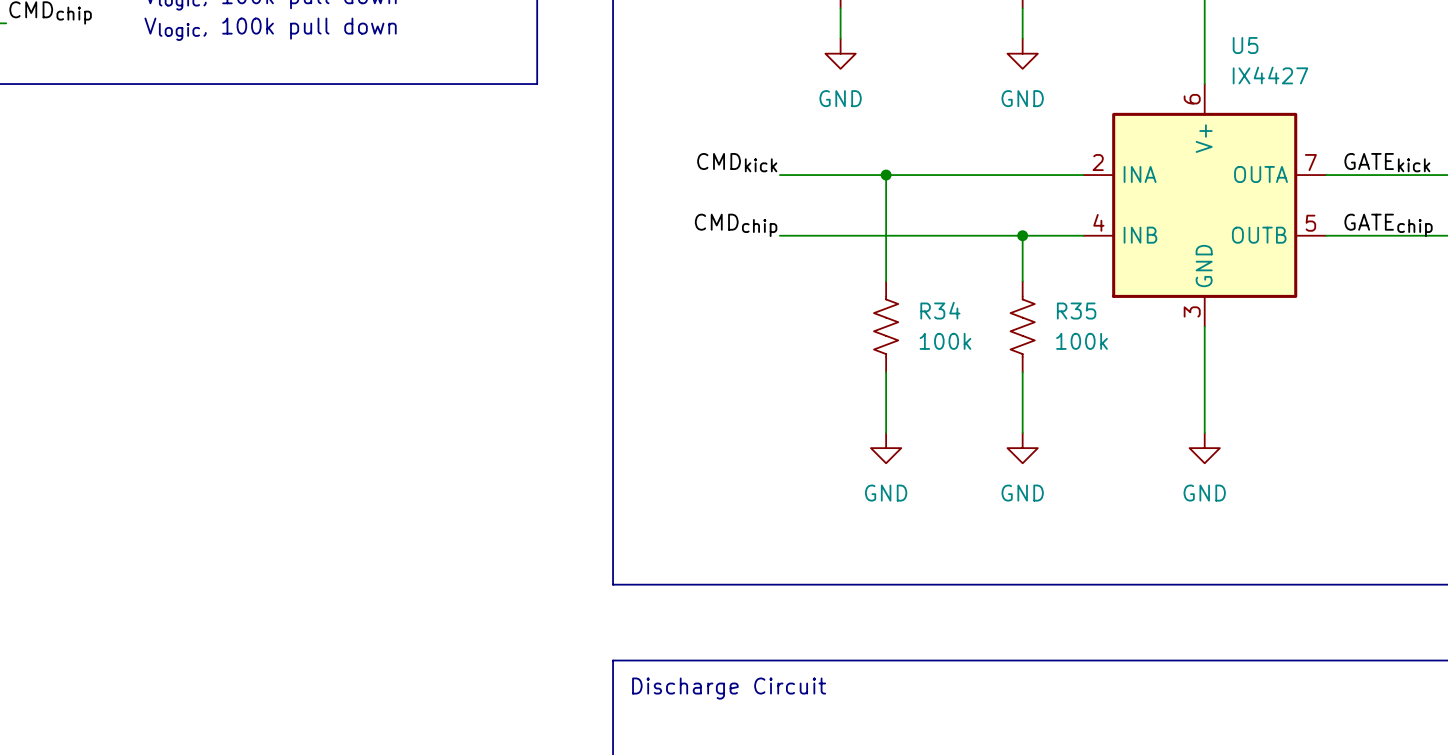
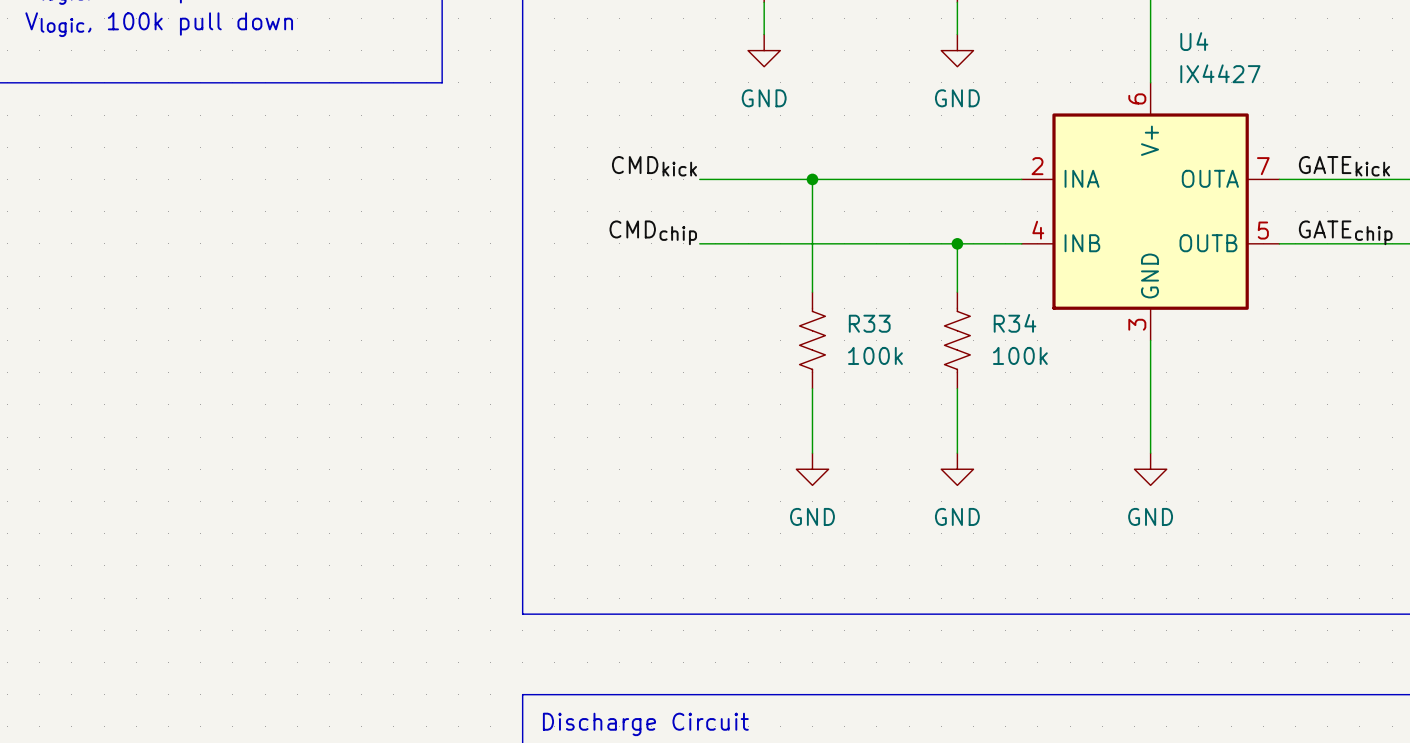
U5 name: U5 (1245, 45) -> U4 (1194, 41)
R34 name: R34 (940, 310) -> R33 (869, 323)
R35 name: R35 (1076, 311) -> R34 (1015, 323)

